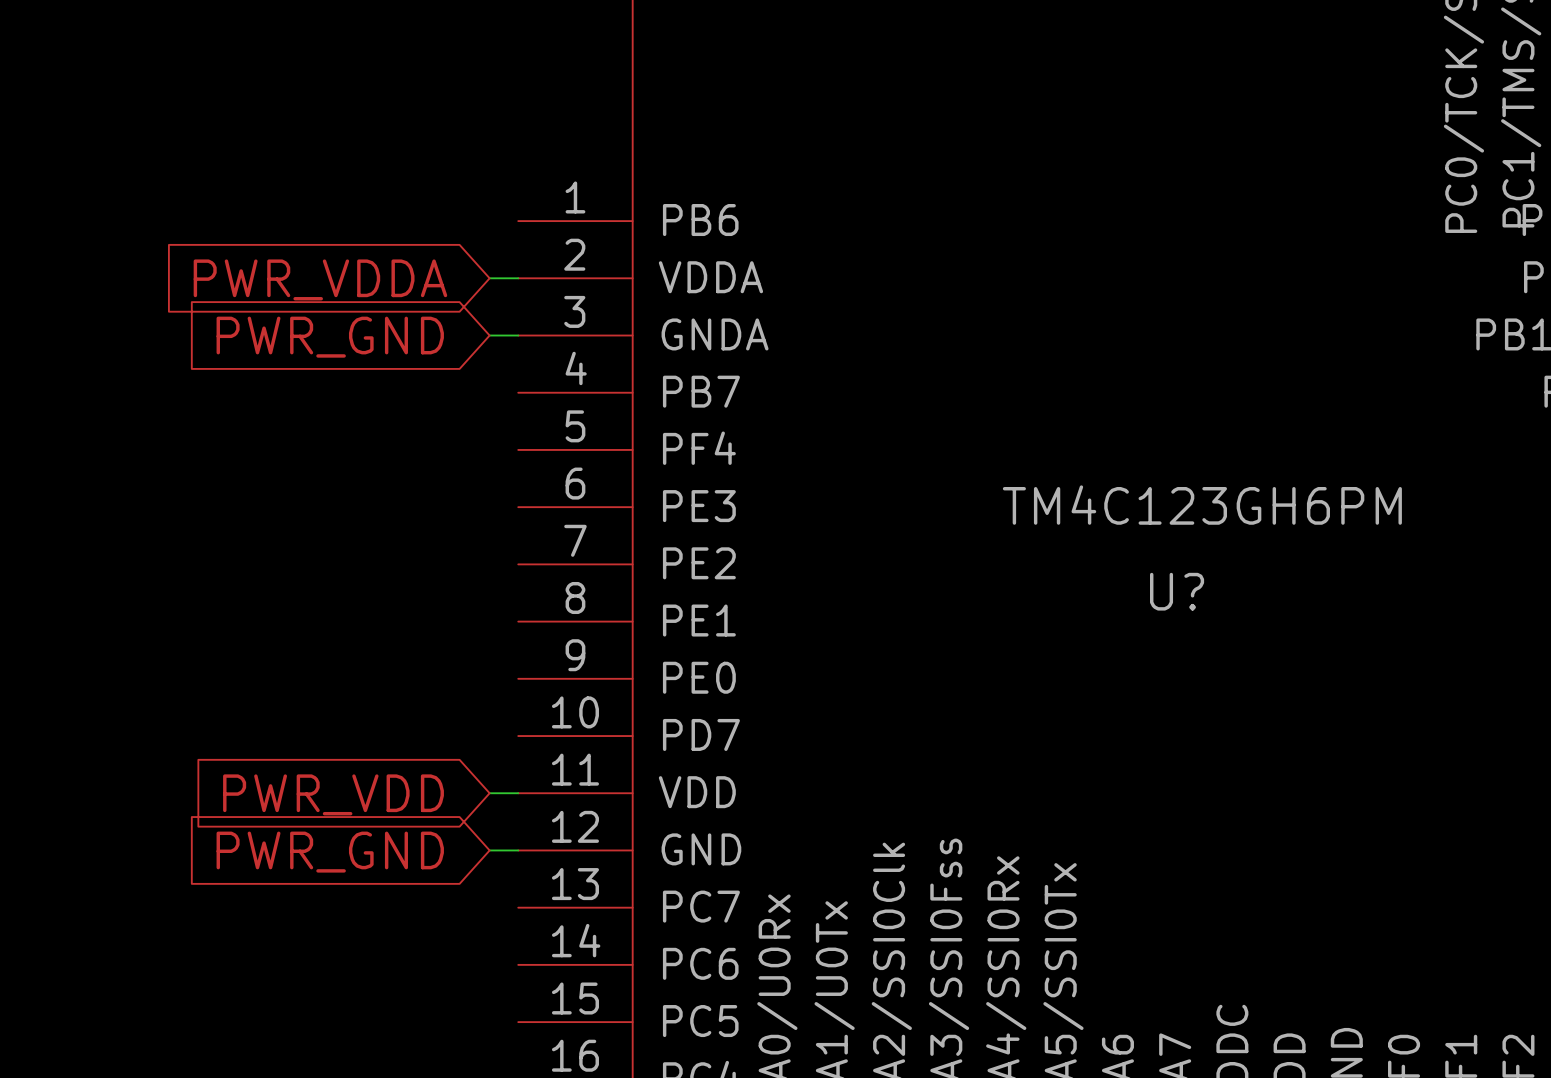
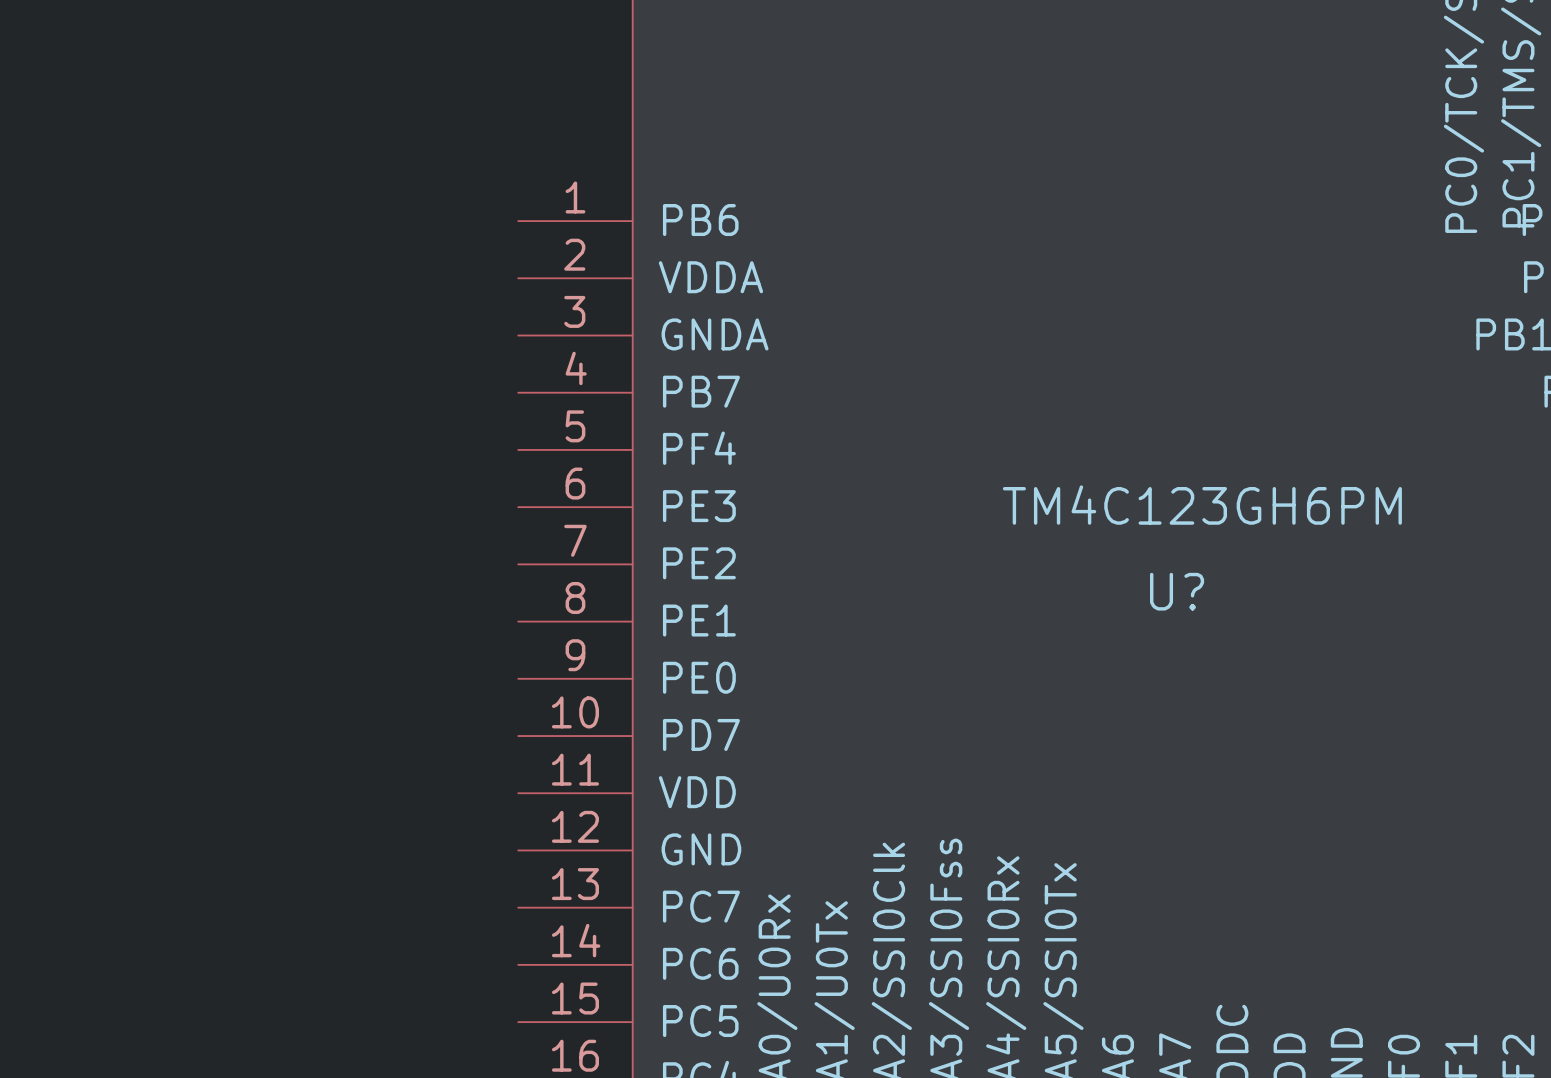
wire: (489, 278) (518, 278) -> none
global label: PWR_VDDA (320, 279) -> none
wire: (489, 335) (518, 335) -> none
global label: PWR_GND (330, 337) -> none
wire: (489, 793) (518, 793) -> none
global label: PWR_VDD (333, 794) -> none
wire: (489, 850) (518, 850) -> none
global label: PWR_GND (330, 852) -> none

